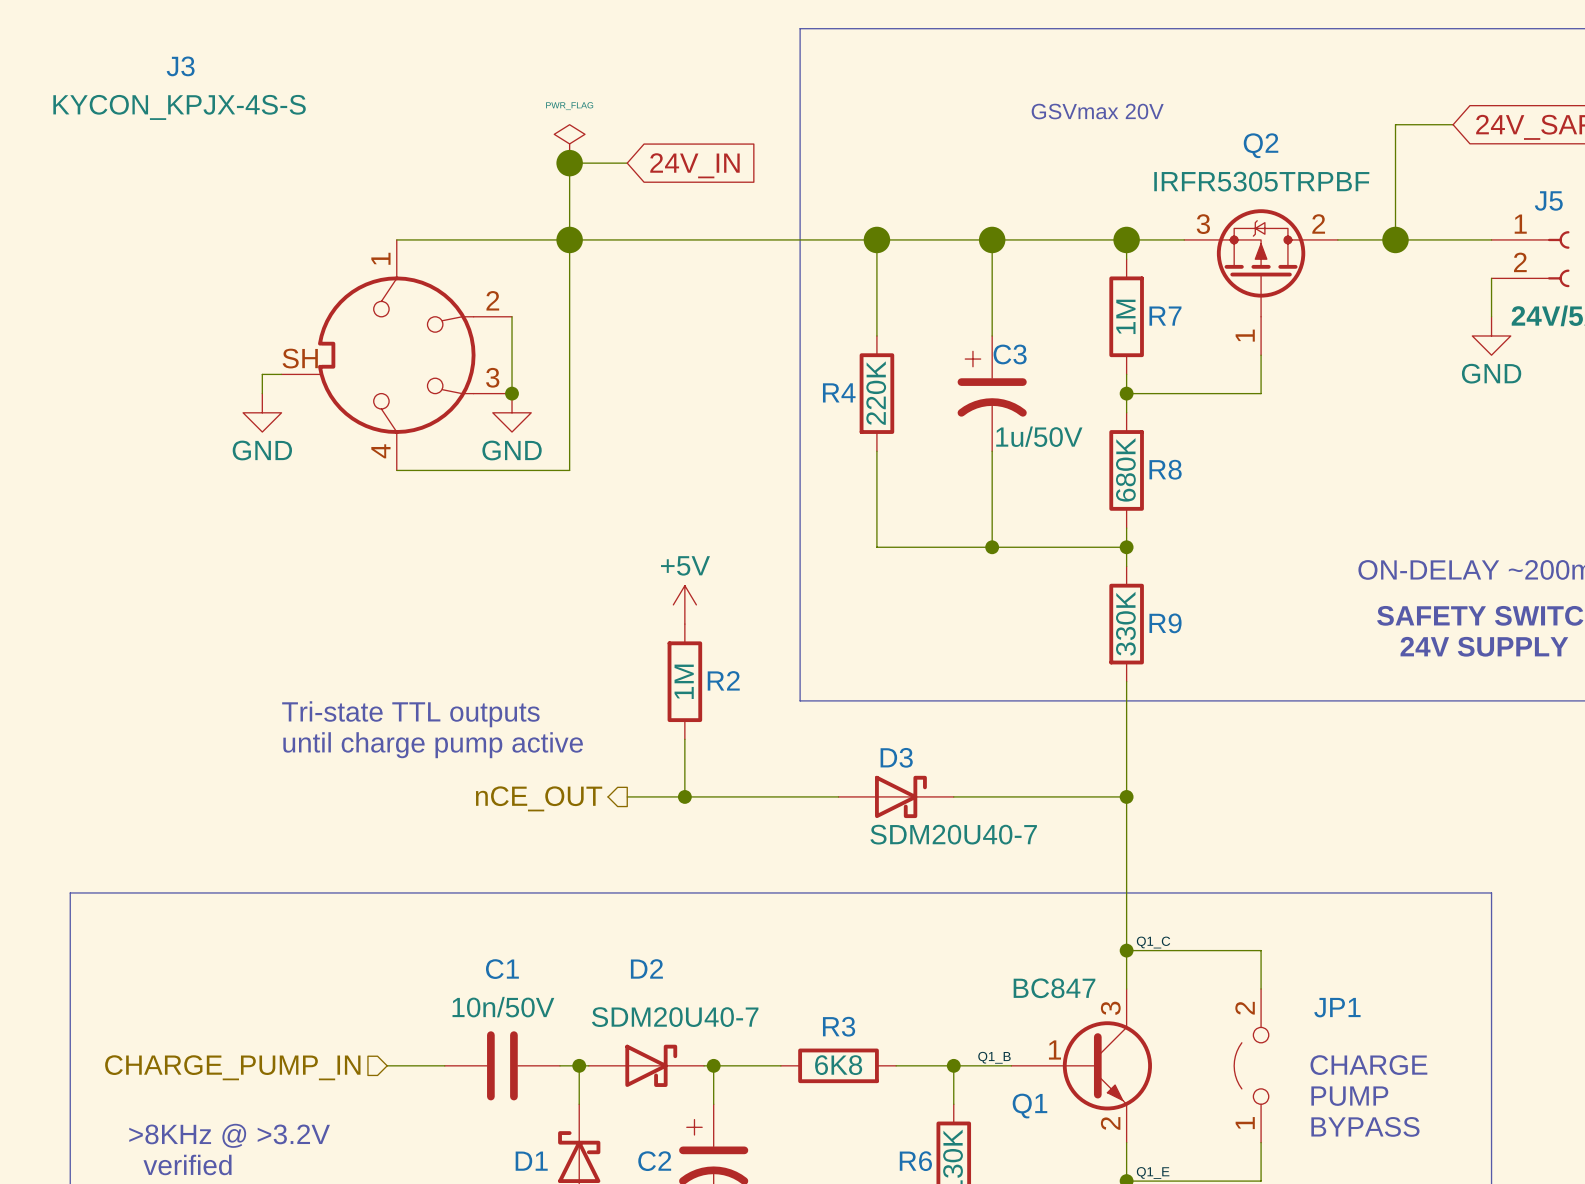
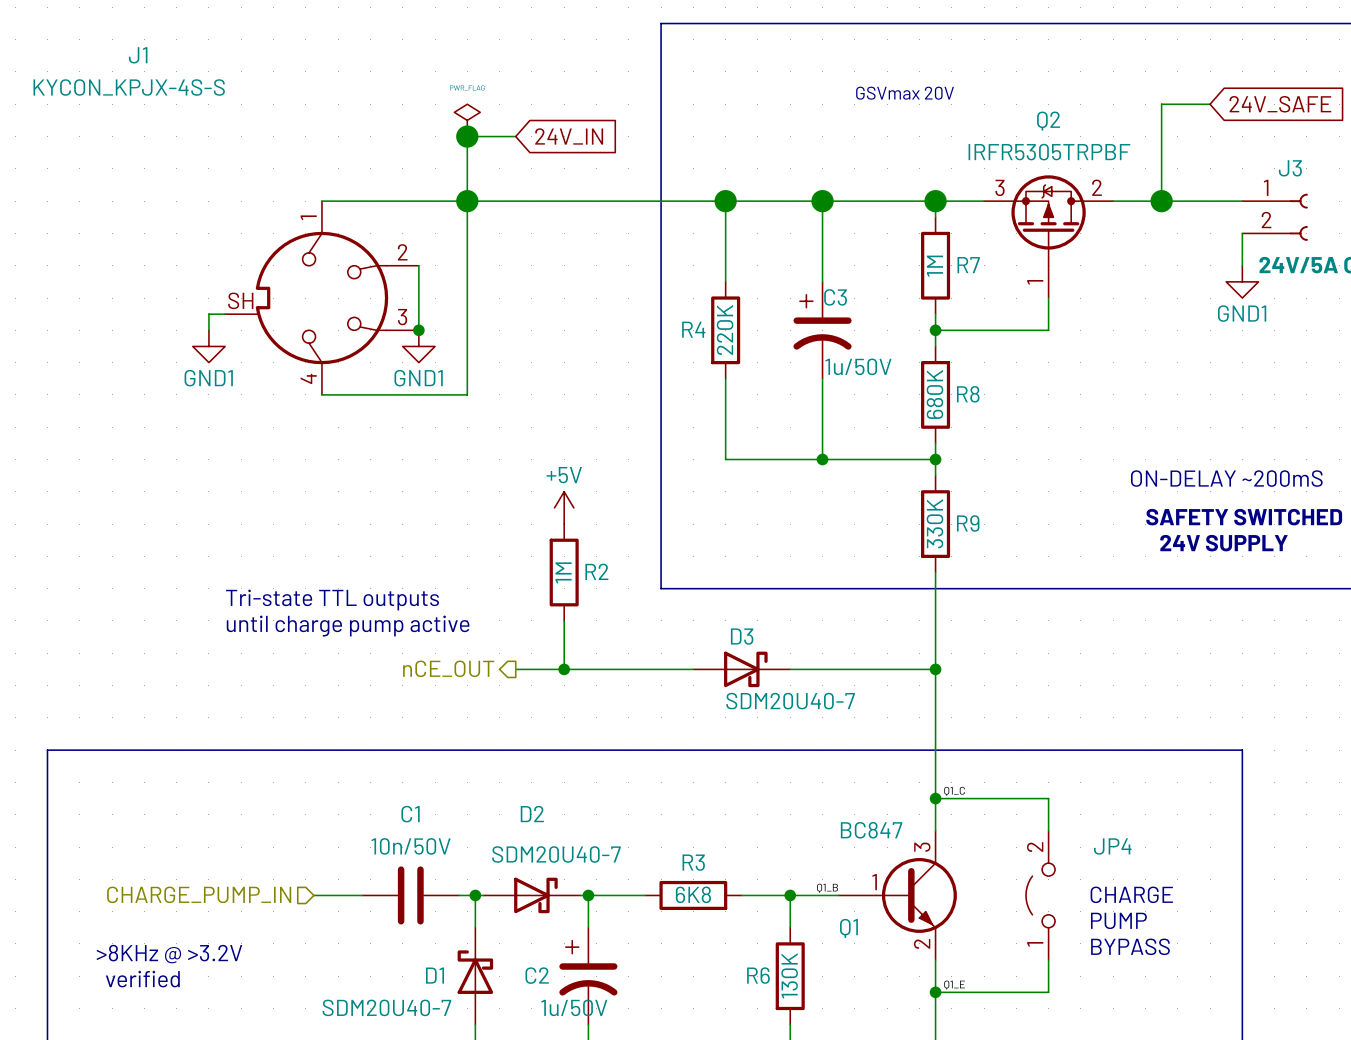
J3 name: J3 (180, 66) -> J1 (138, 55)
J5 name: J5 (1548, 200) -> J3 (1290, 168)
power symbol: GND (1491, 335) -> GND1 (1242, 281)
power symbol: GND (262, 412) -> GND1 (208, 346)
power symbol: GND (512, 412) -> GND1 (418, 346)
JP1 name: JP1 (1337, 1007) -> JP4 (1112, 846)

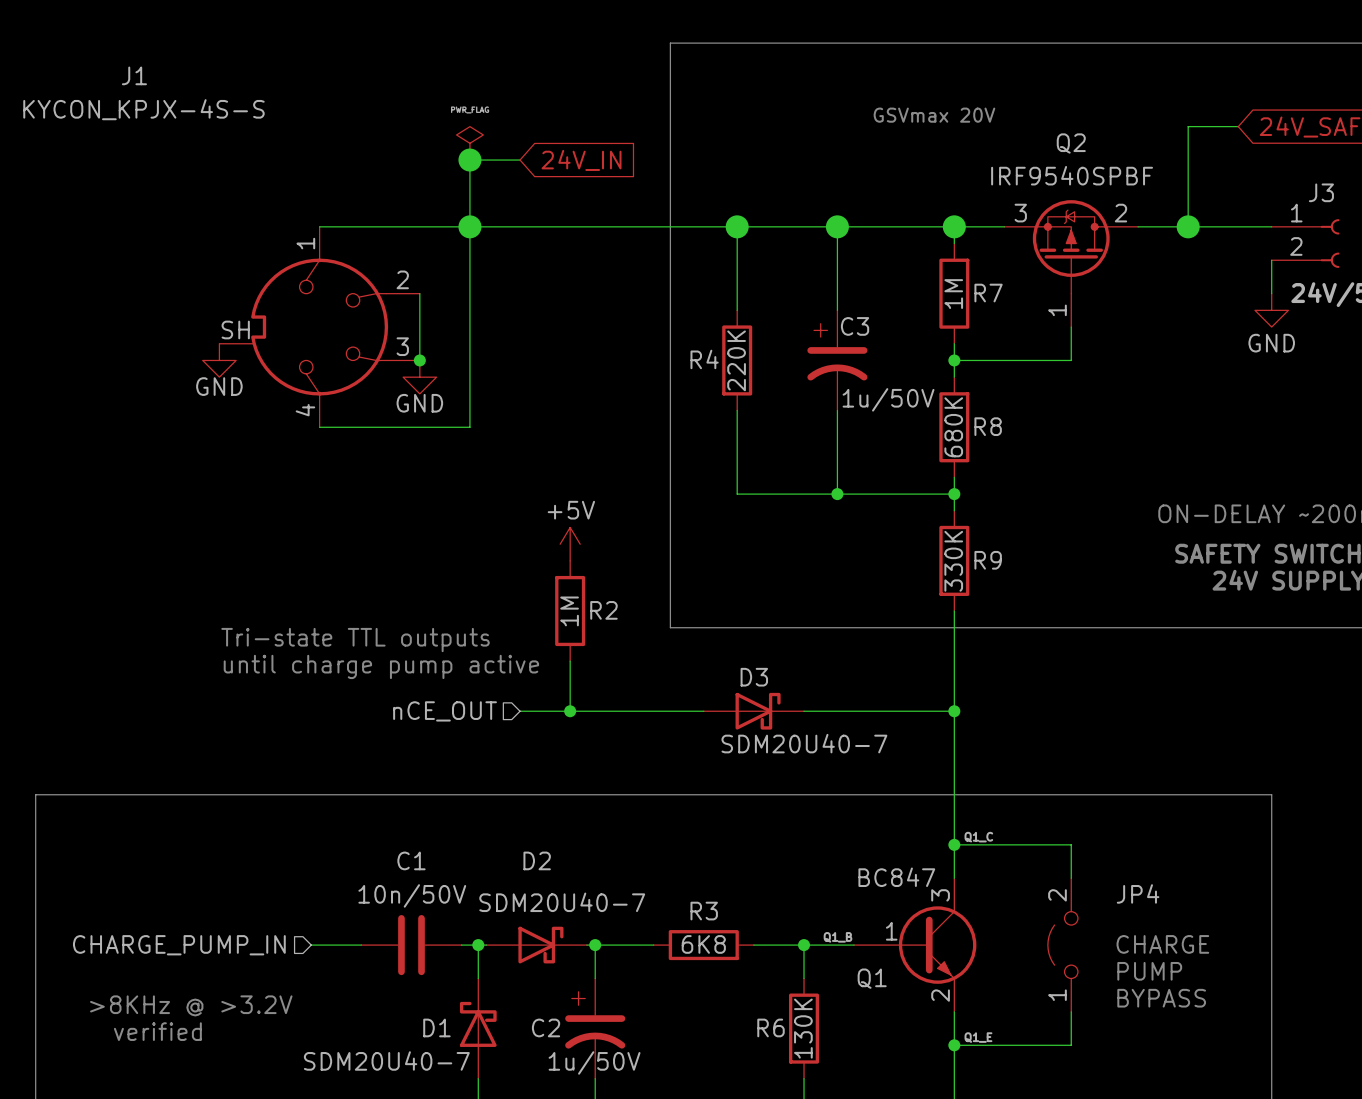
Q2 value: IRFR5305TRPBF (1049, 152) -> IRF9540SPBF (1072, 175)
power symbol: GND1 (1242, 281) -> GND (1271, 310)
wire: (225, 314) (208, 314) (208, 330) -> none
power symbol: none -> GND (219, 360)
power symbol: GND1 (208, 346) -> none
power symbol: GND1 (418, 346) -> GND (419, 377)
hierarchical label shape: output (448, 668) -> input (445, 711)

